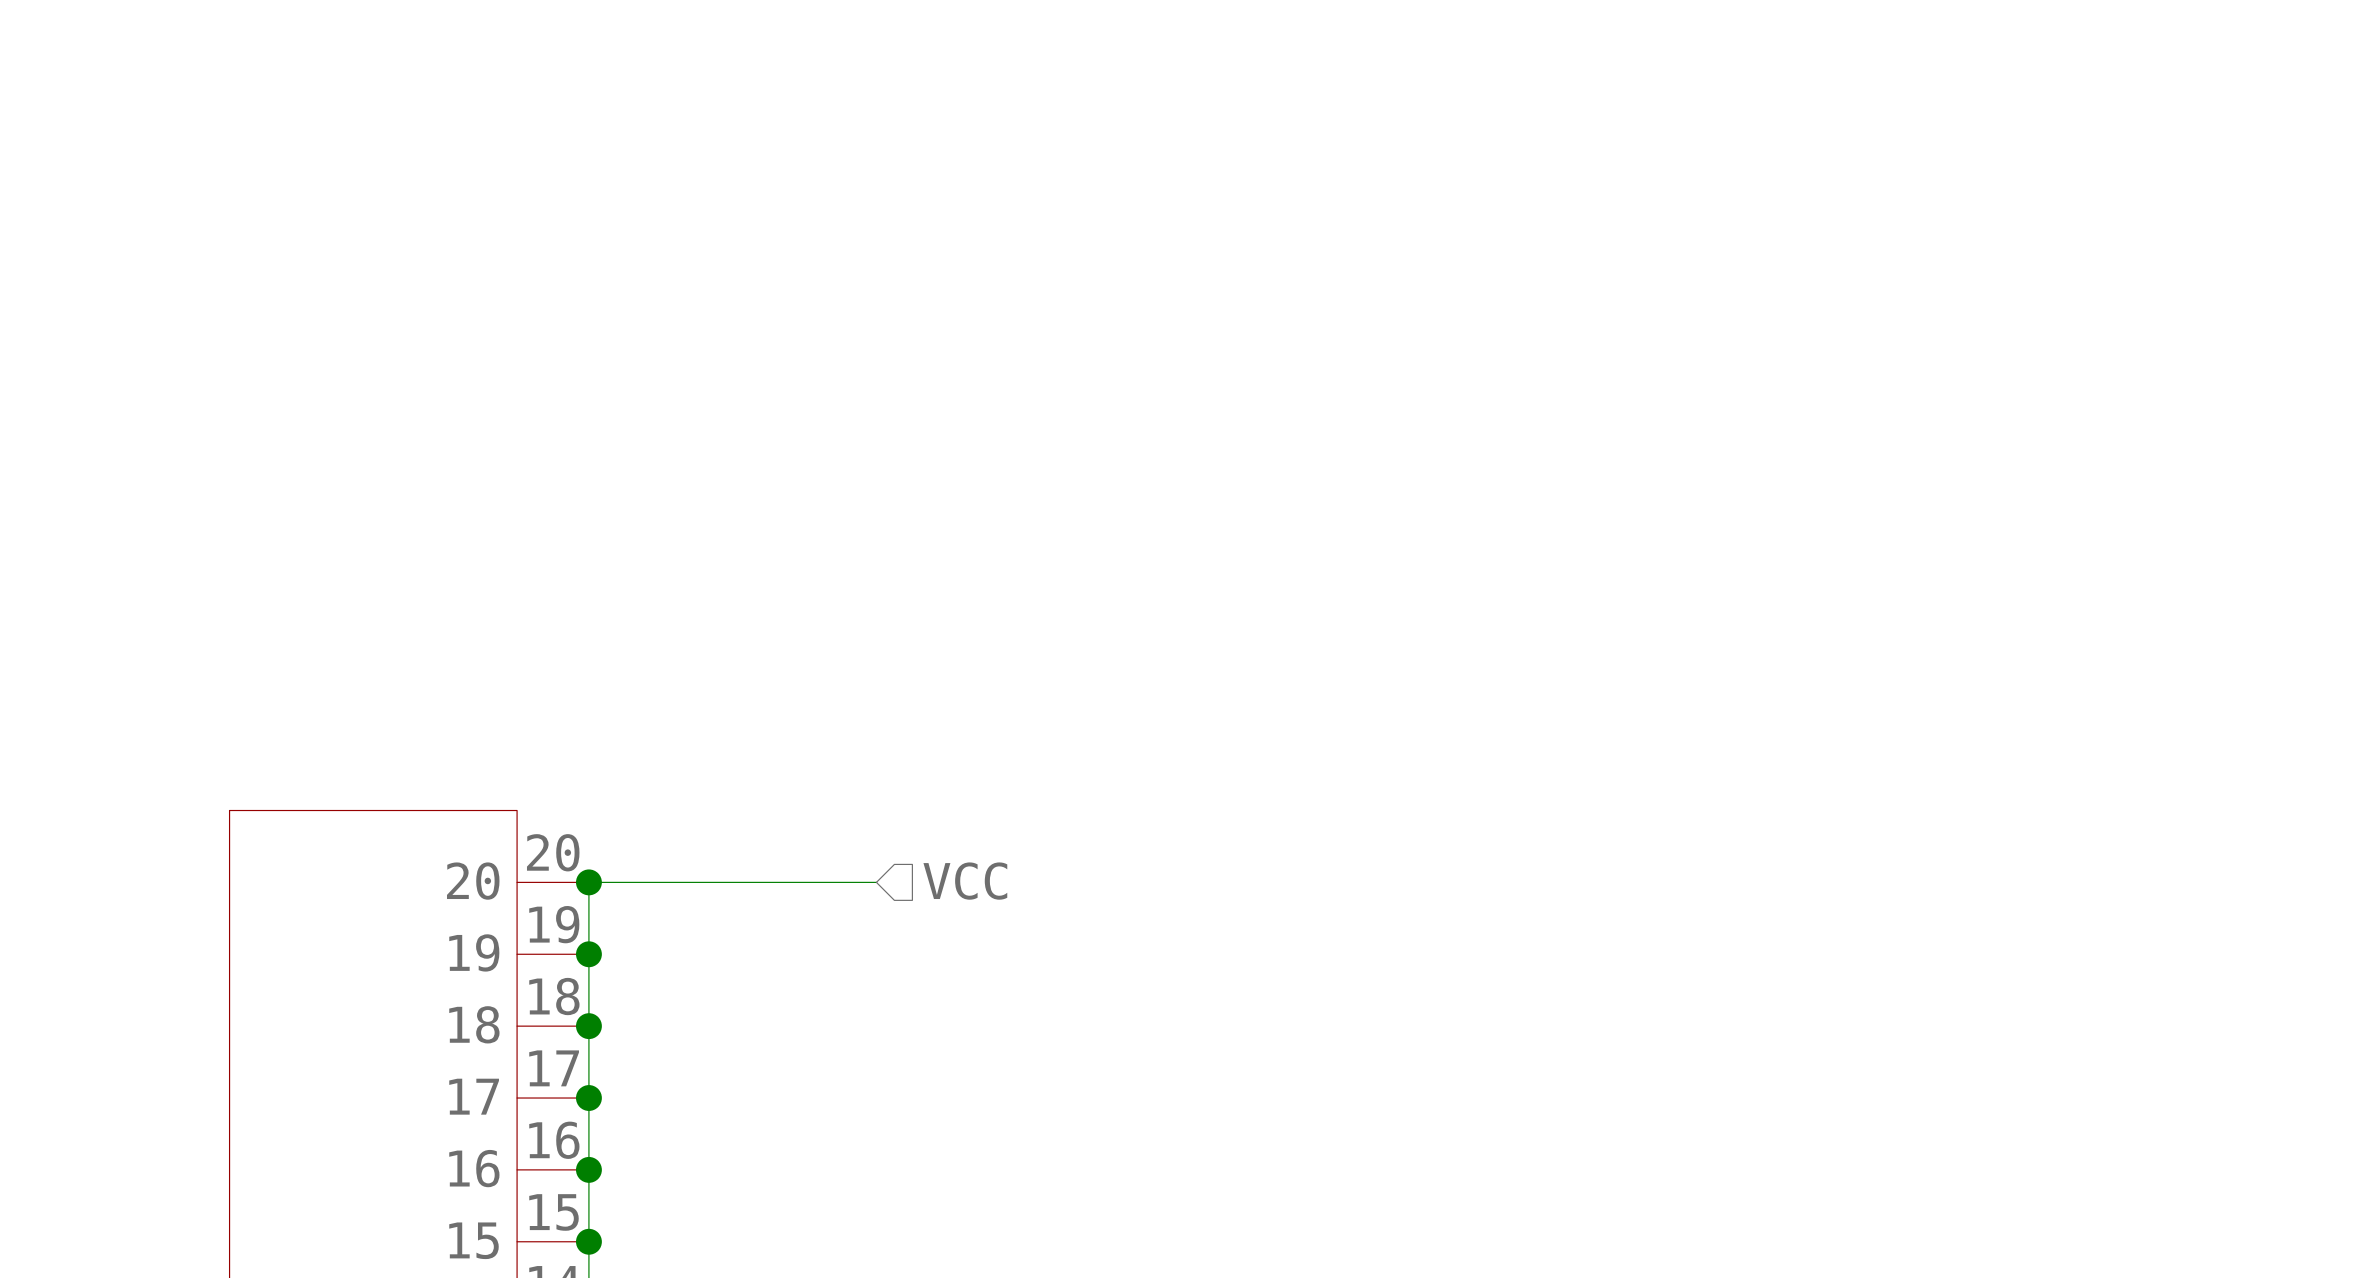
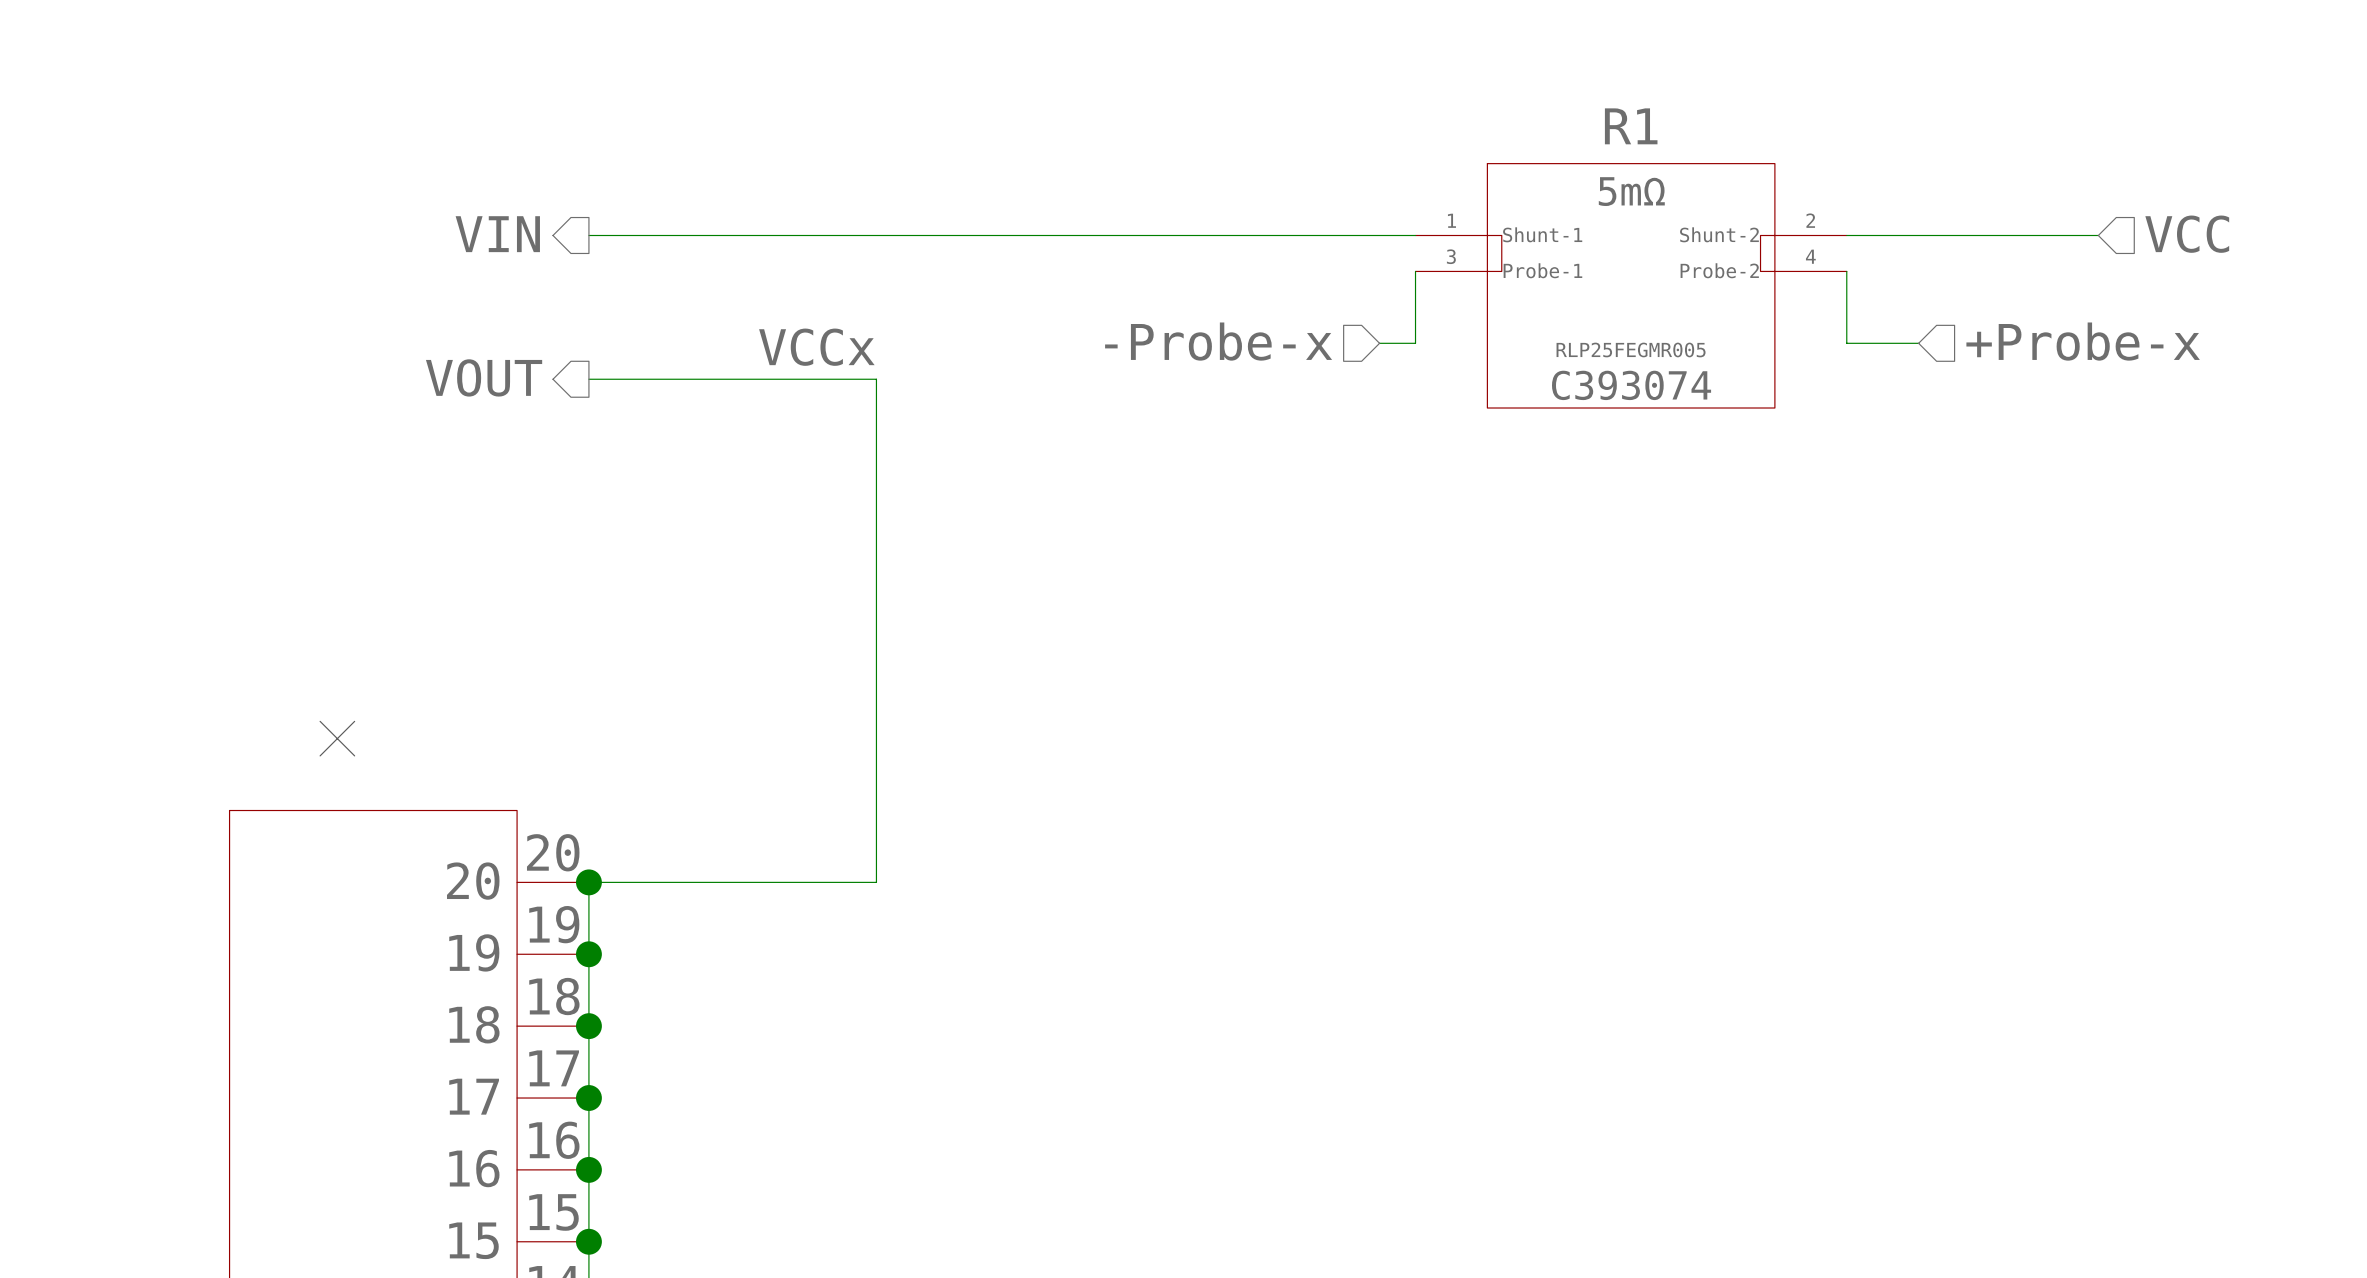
sheet pin: none -> VIN (497, 234)
hierarchical label: none -> VCC (2187, 234)
wire: none -> (588, 235) (1415, 235)
wire: none -> (1846, 235) (2098, 235)
wire: none -> (1415, 271) (1415, 343) (1379, 343)
wire: none -> (1846, 271) (1846, 343) (1918, 343)
R1: none -> 5mΩ (1631, 285)
hierarchical label: none -> -Probe-x (1218, 341)
hierarchical label: none -> +Probe-x (2083, 341)
label: none -> VCCx (816, 347)
sheet pin: none -> VOUT (484, 377)
wire: none -> (588, 379) (876, 379) (876, 882)
no-connect mark: none -> (337, 738)
hierarchical label: VCC (965, 881) -> none

